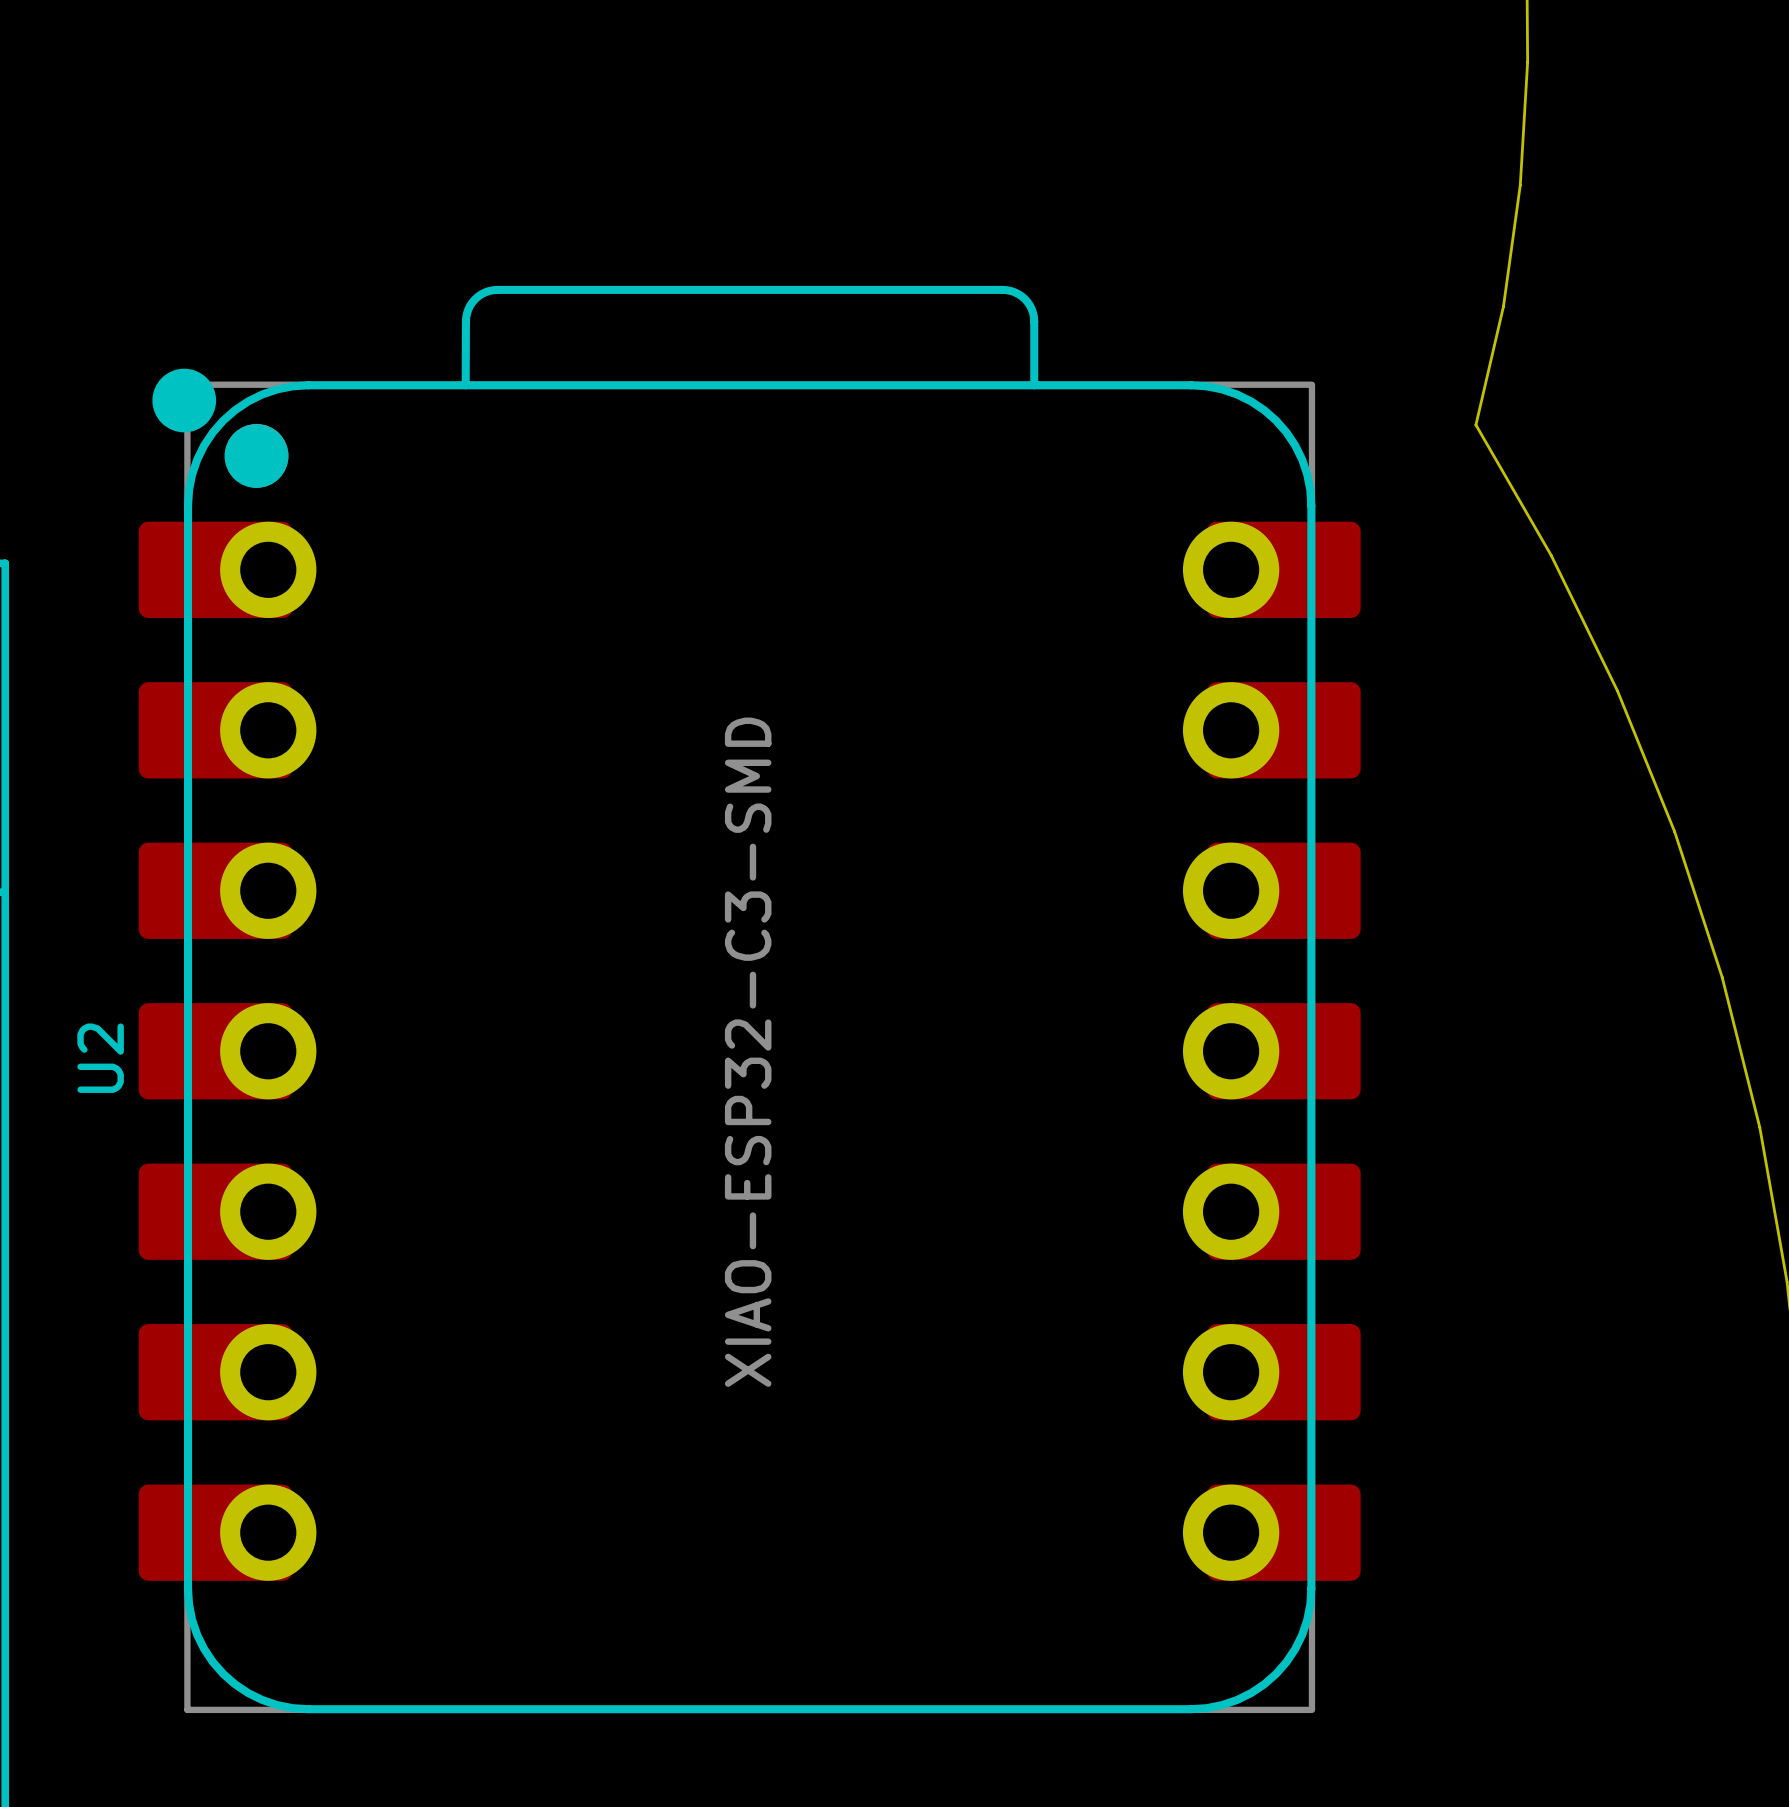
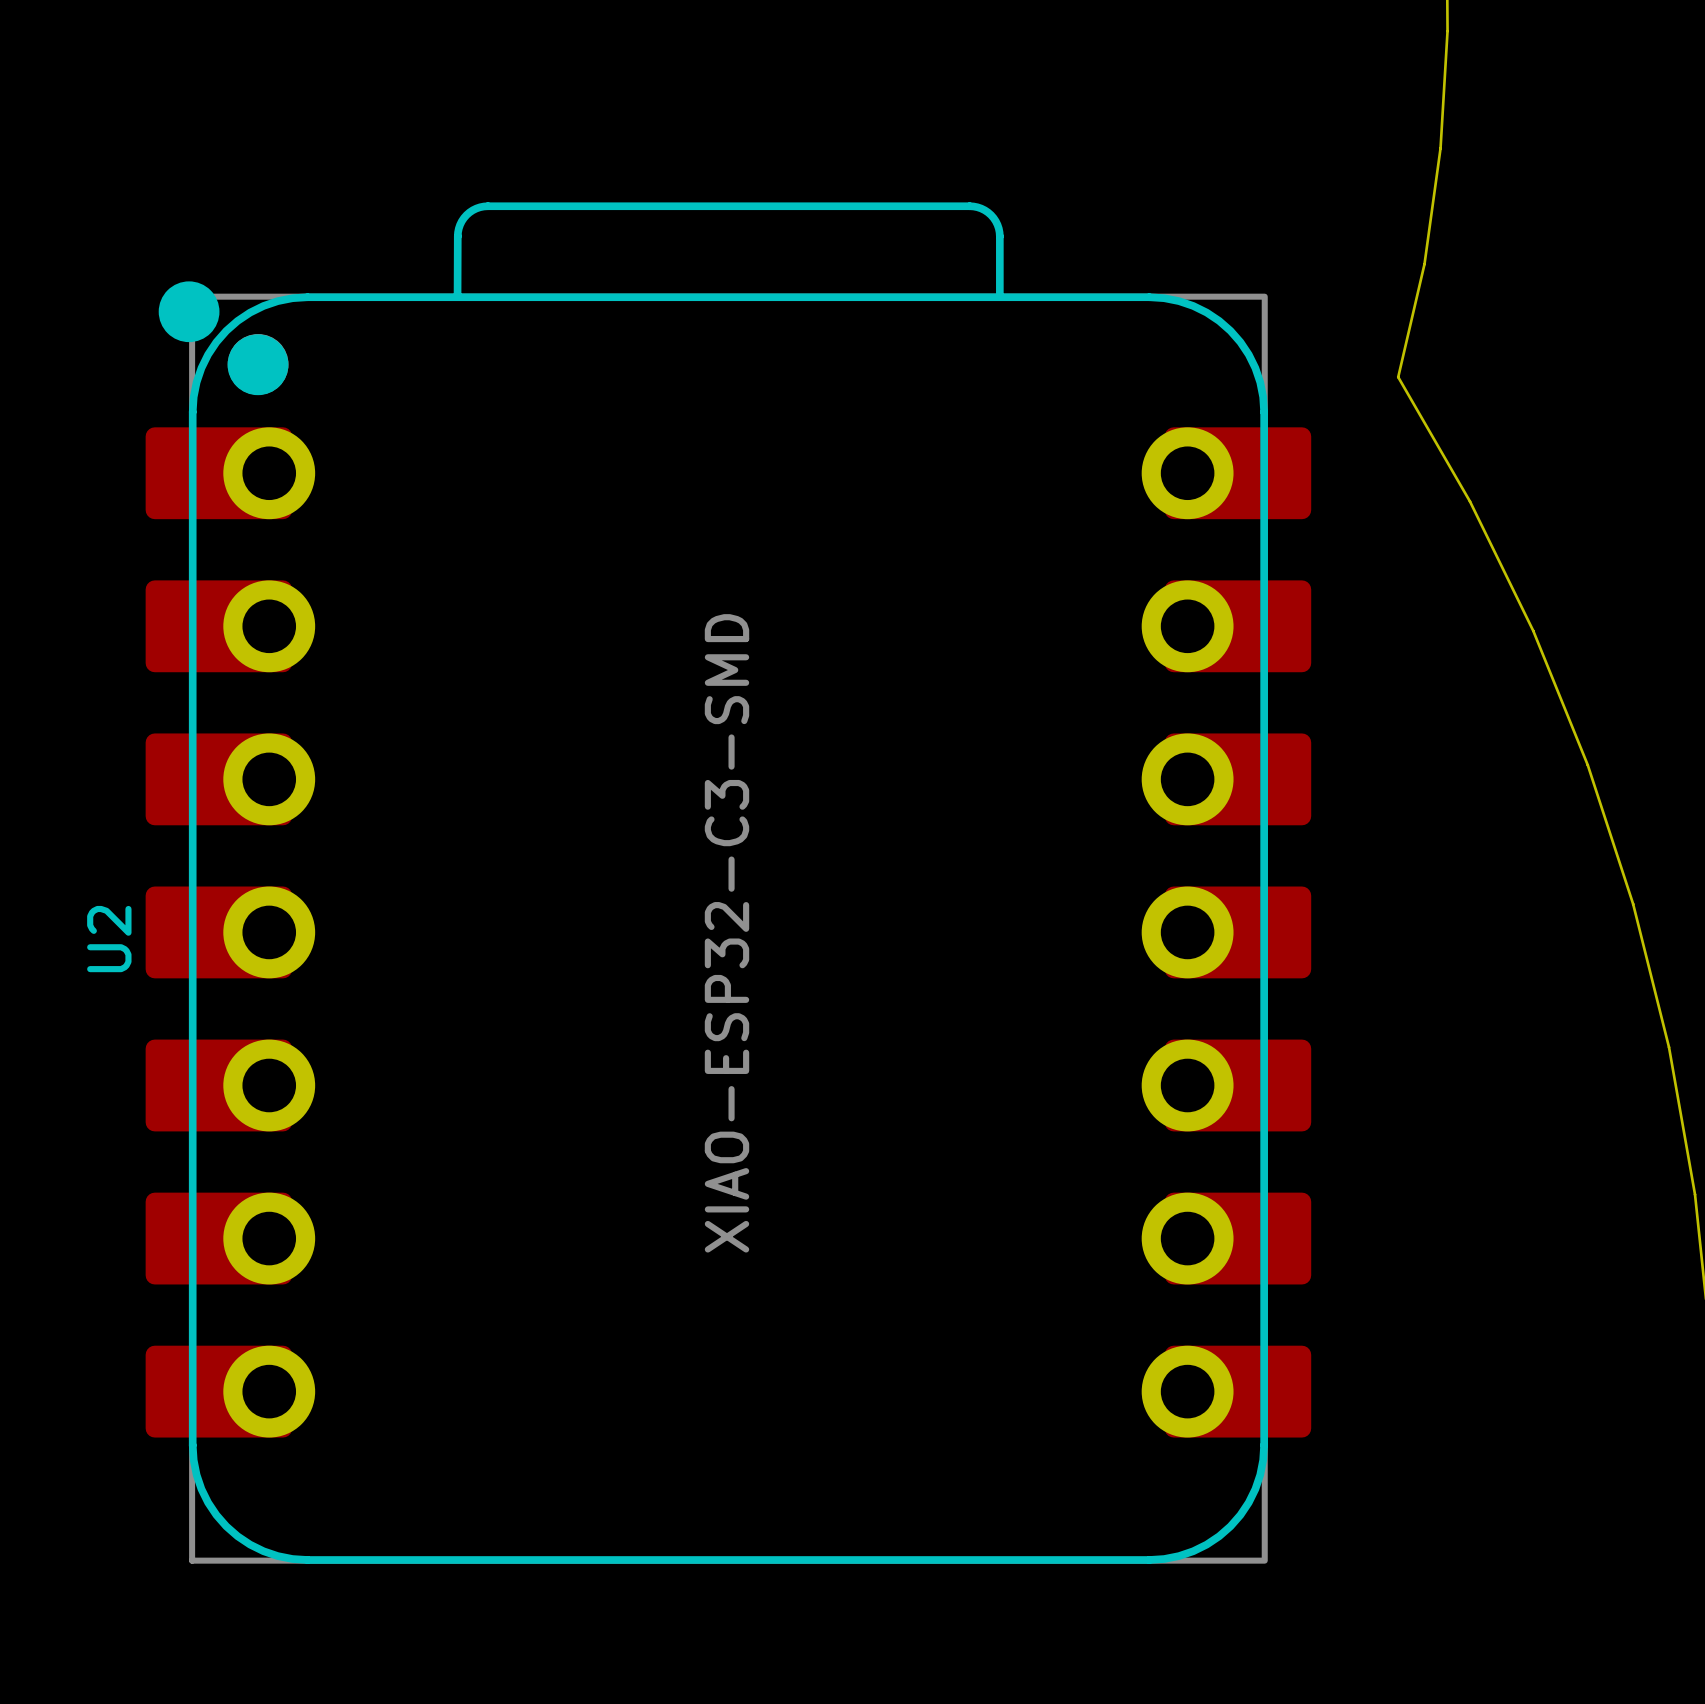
U2 position: (749, 999) -> (728, 883)

